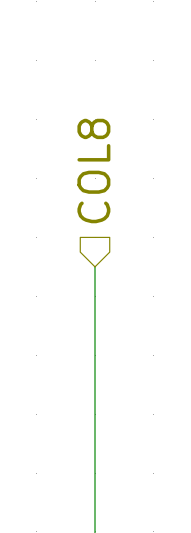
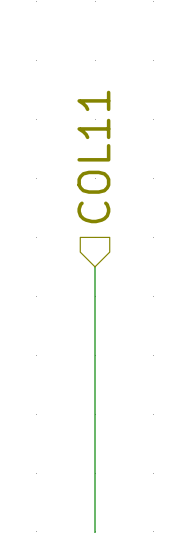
hierarchical label: COL8 (93, 171) -> COL11 (93, 157)

